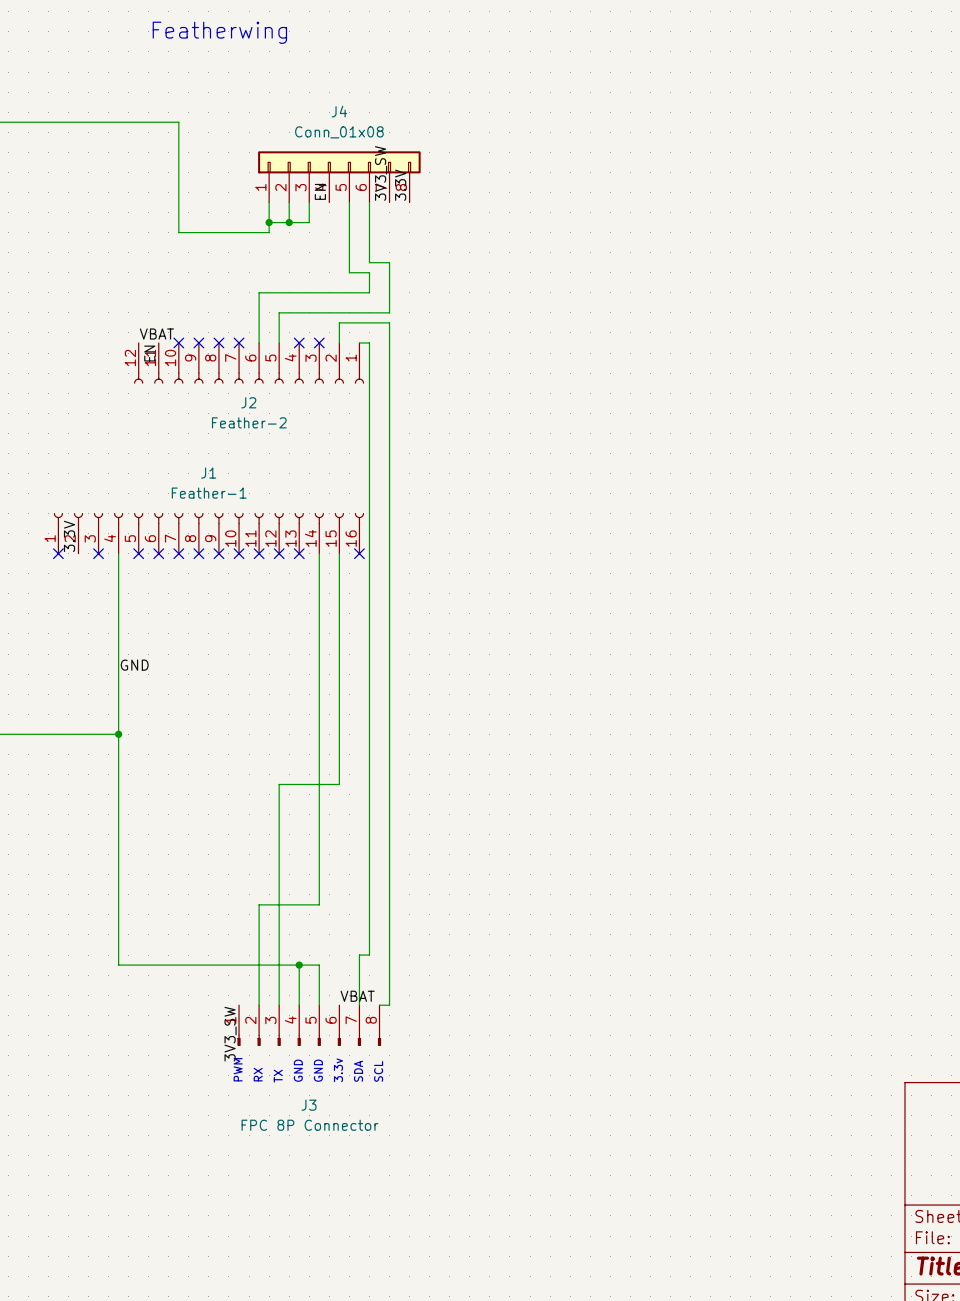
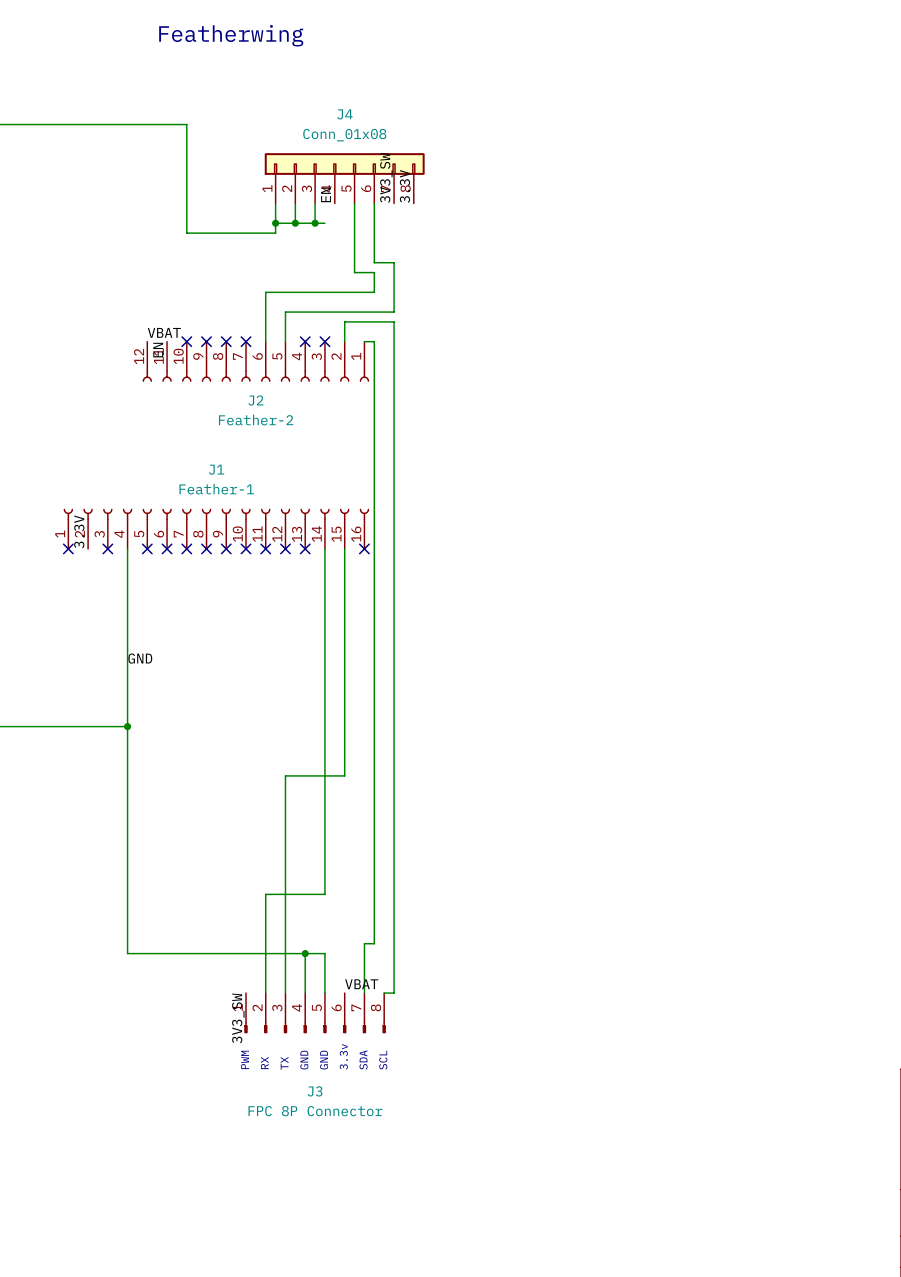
wire: none -> (315, 223) (324, 223)
junction: none -> (315, 223)

